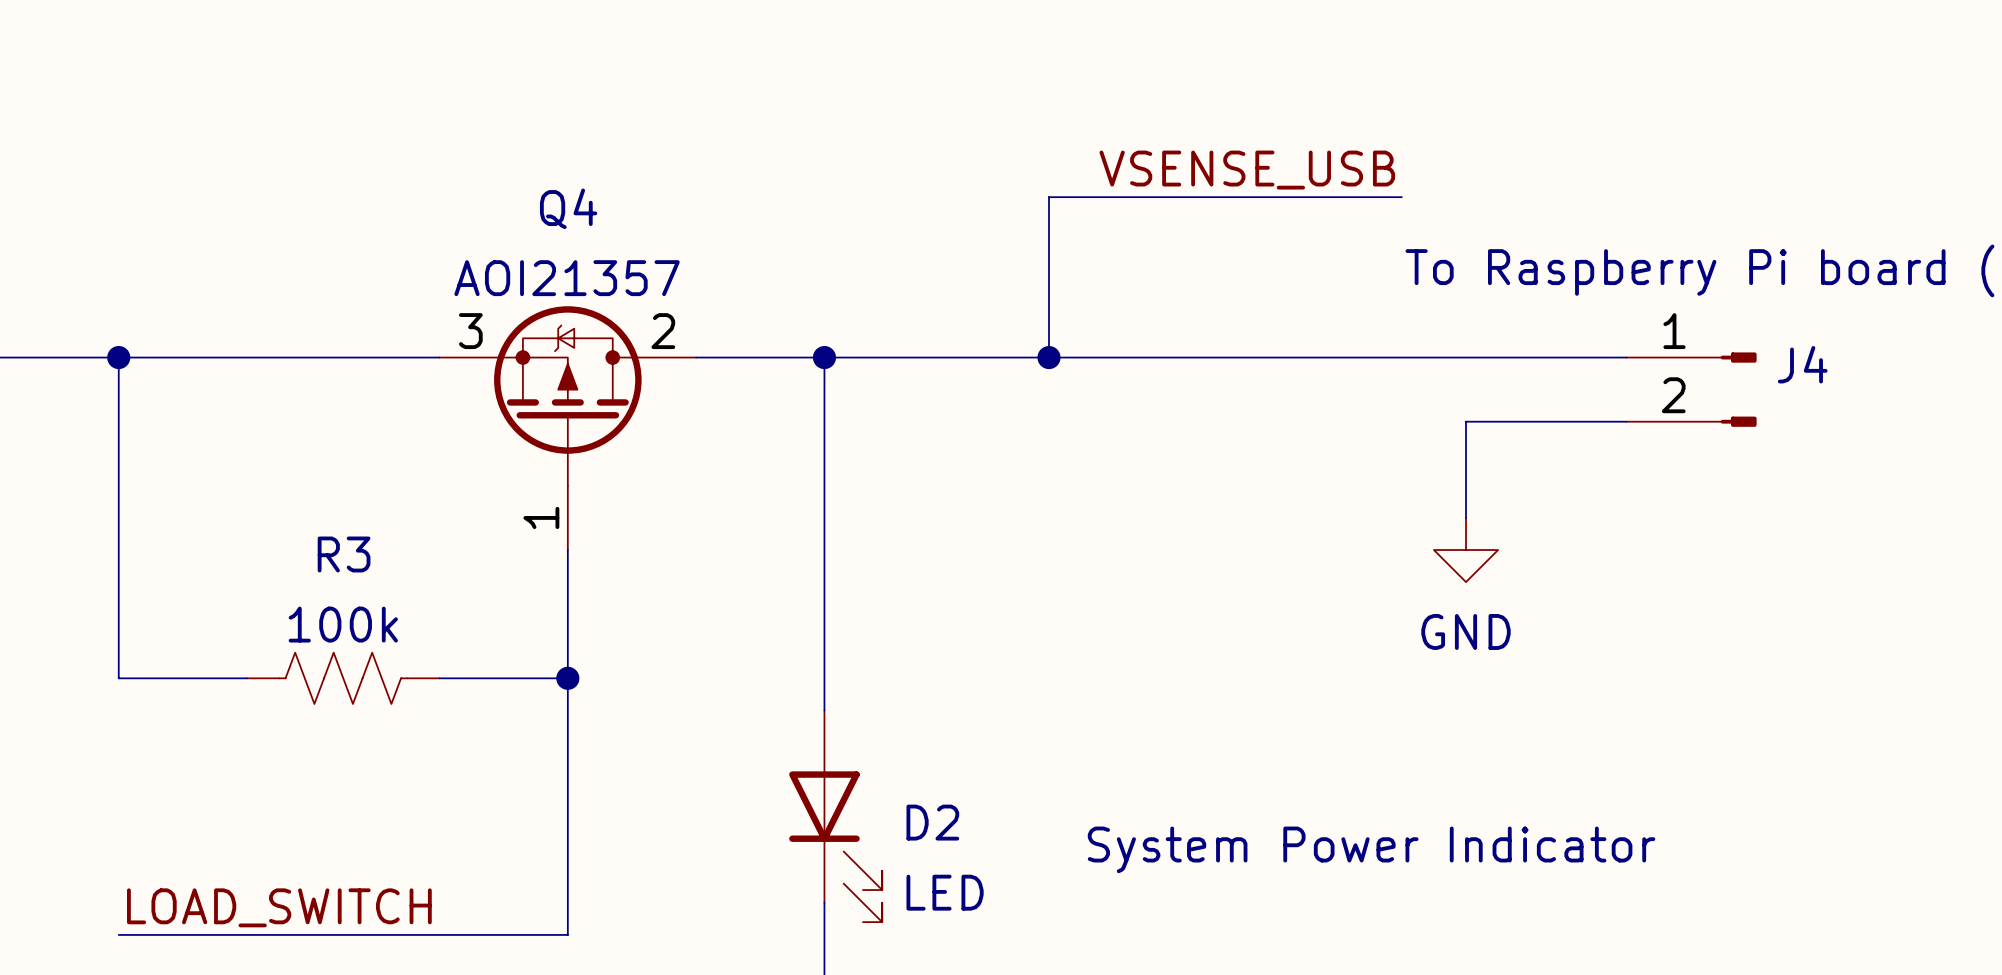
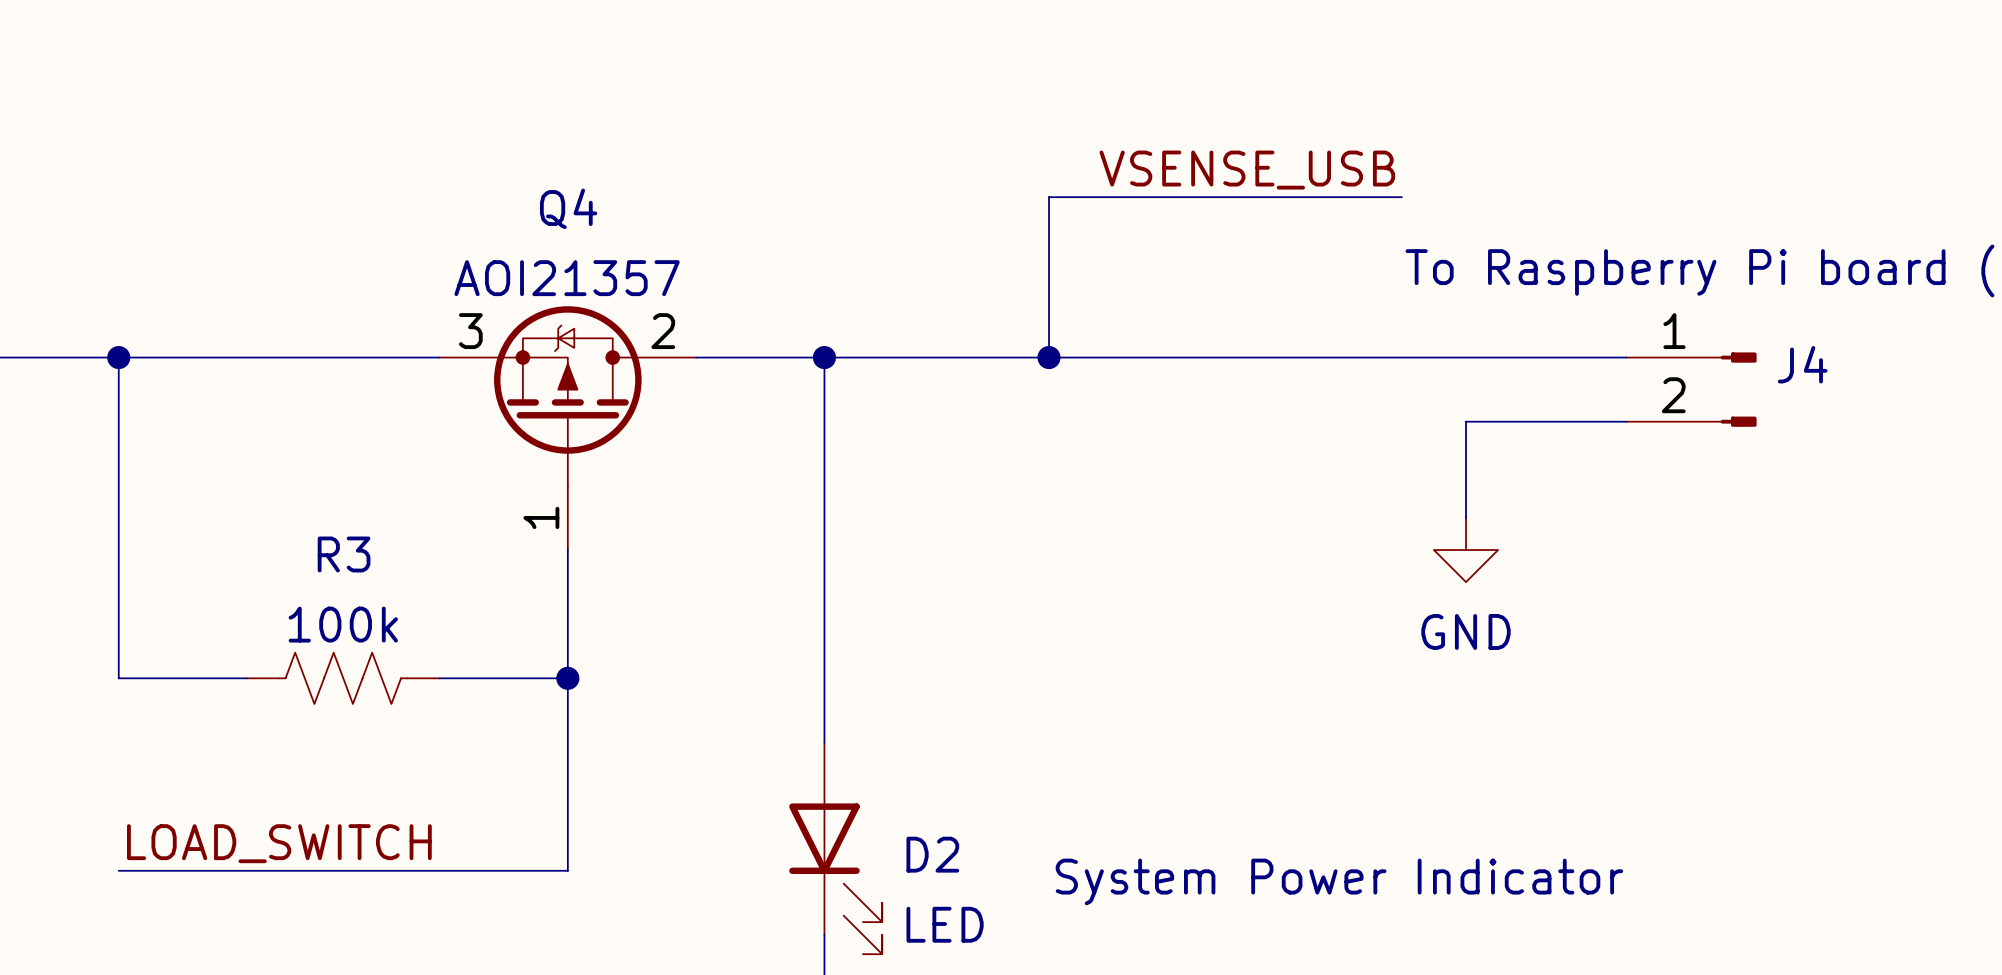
D2 position: (835, 816) -> (835, 848)
text position: System Power Indicator (1371, 849) -> System Power Indicator (1339, 881)
wire: (567, 870) (567, 934) (118, 934) -> (567, 870) (118, 870)
label position: LOAD_SWITCH (279, 907) -> LOAD_SWITCH (279, 843)

